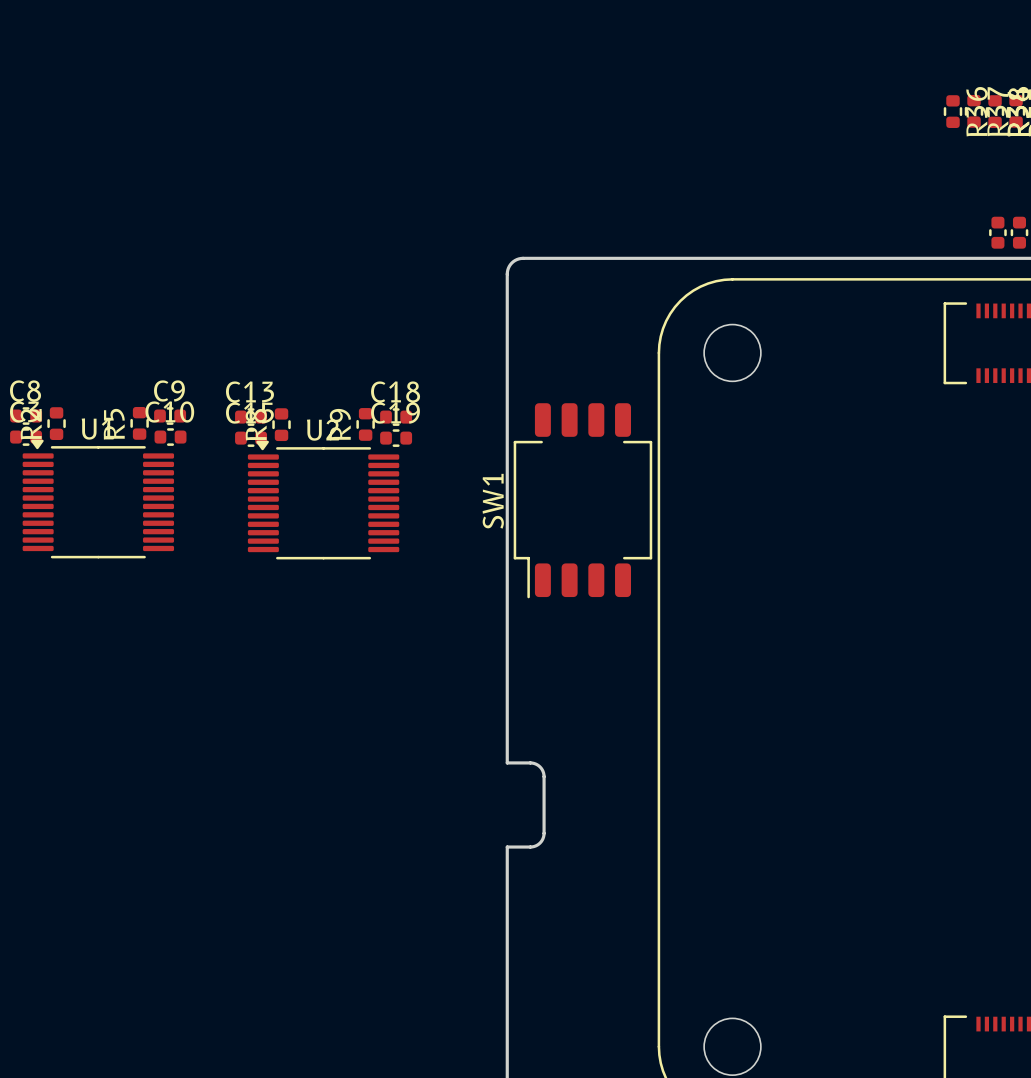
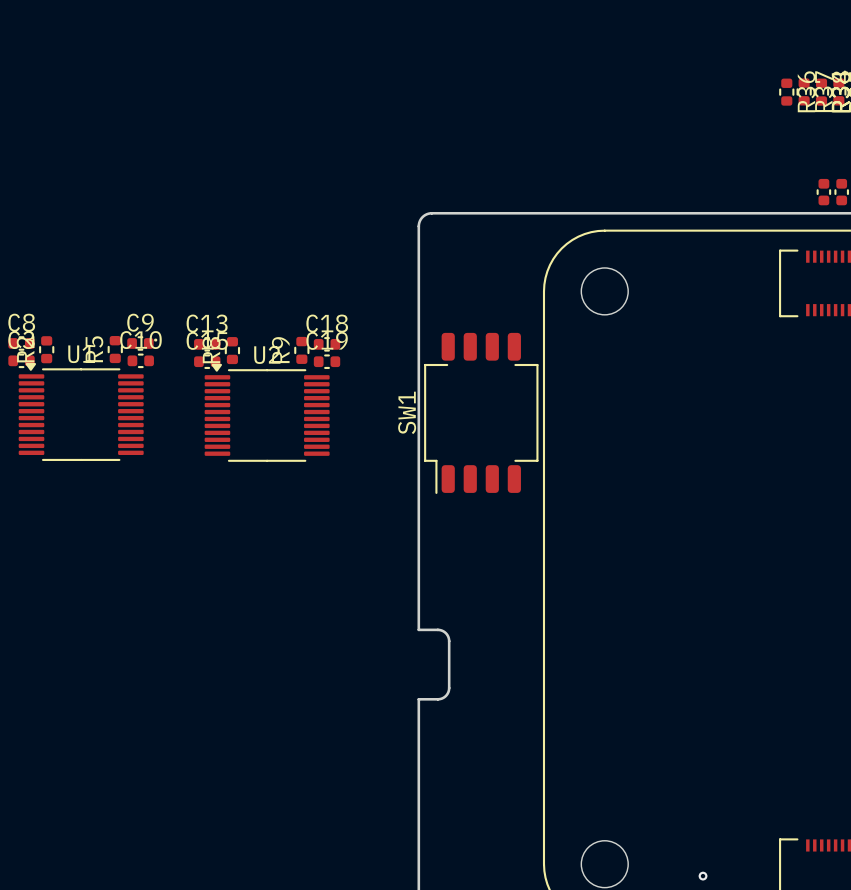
via: none -> (703, 876)

